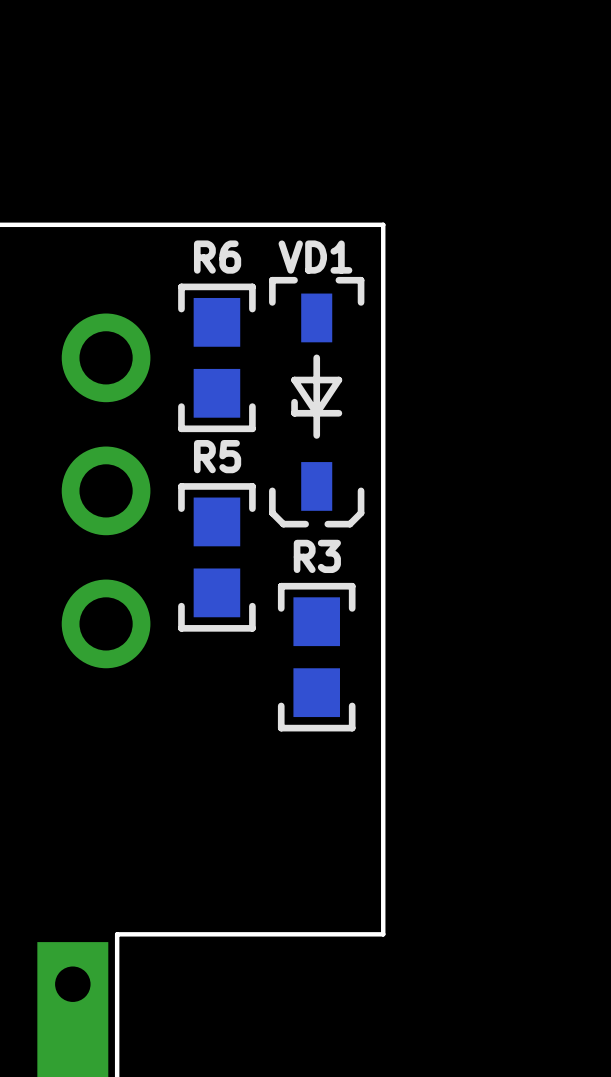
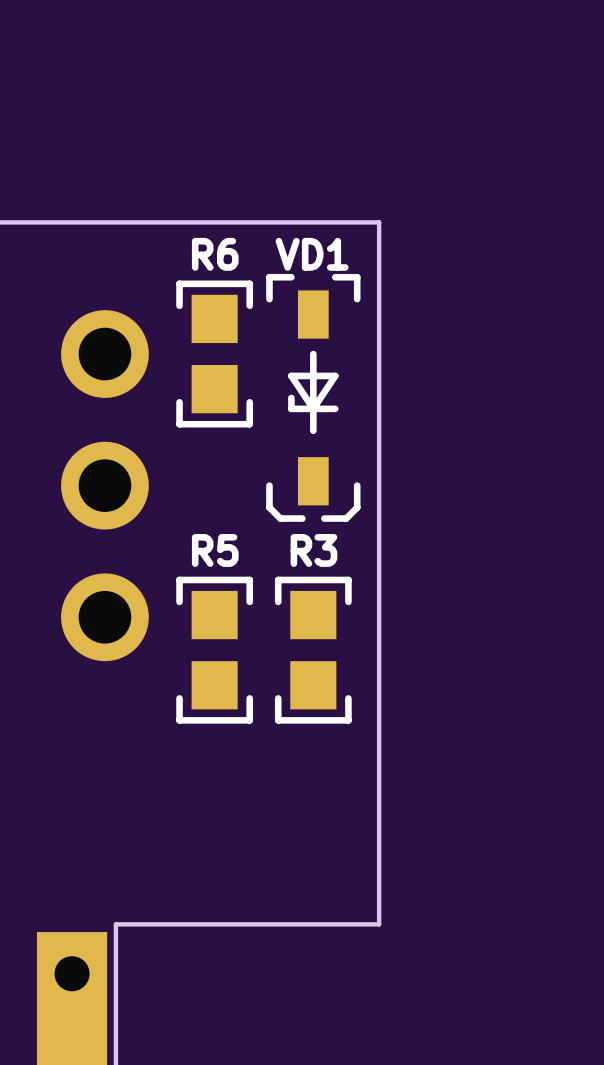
R5 position: (216, 557) -> (214, 650)

